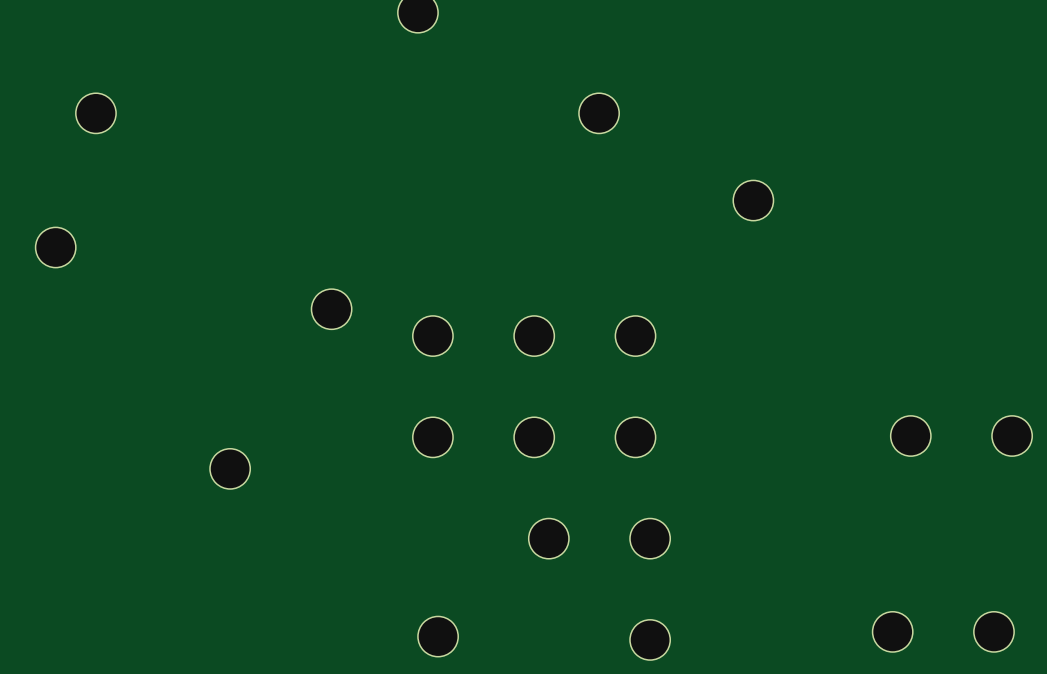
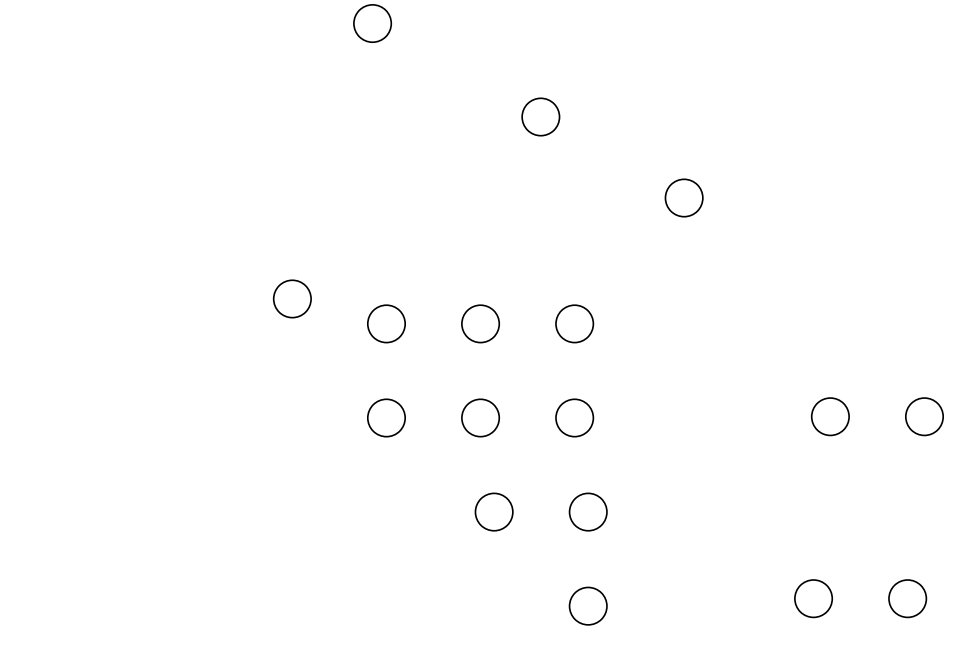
part: (95, 113) -> none
part: (55, 247) -> none
part: (230, 468) -> none
part: (438, 636) -> none

